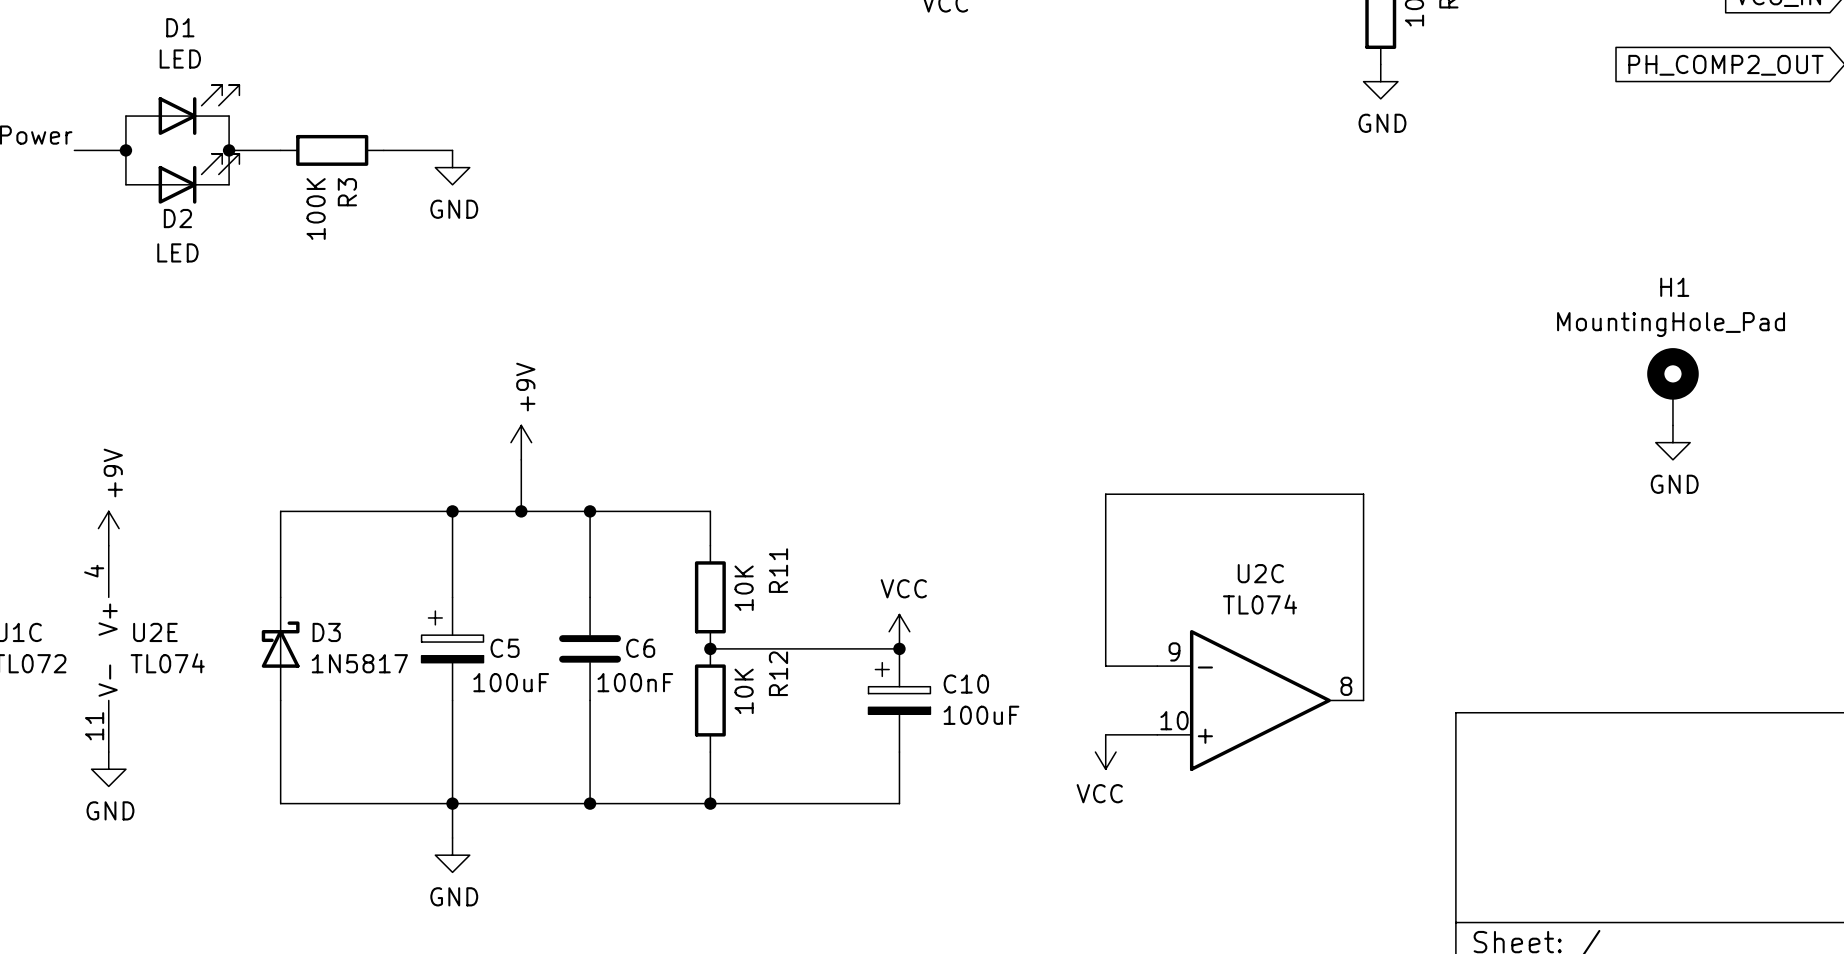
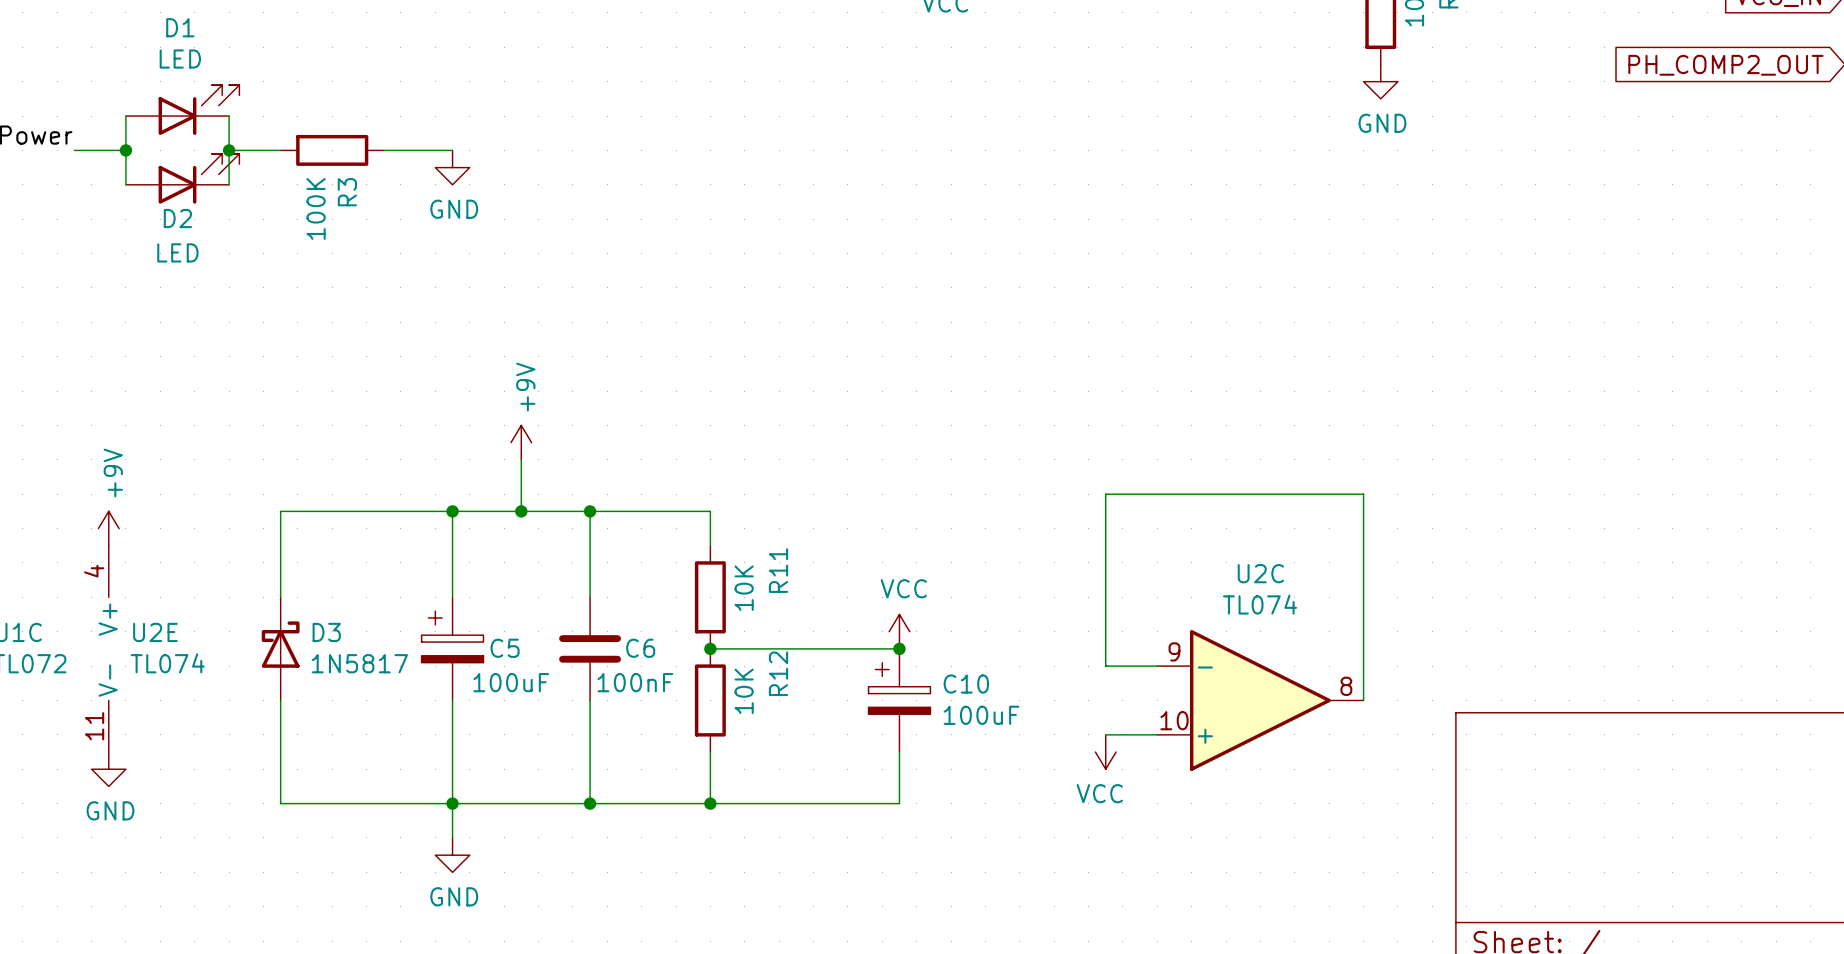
H1: MountingHole_Pad (1672, 386) -> none
power symbol: GND (1672, 442) -> none

